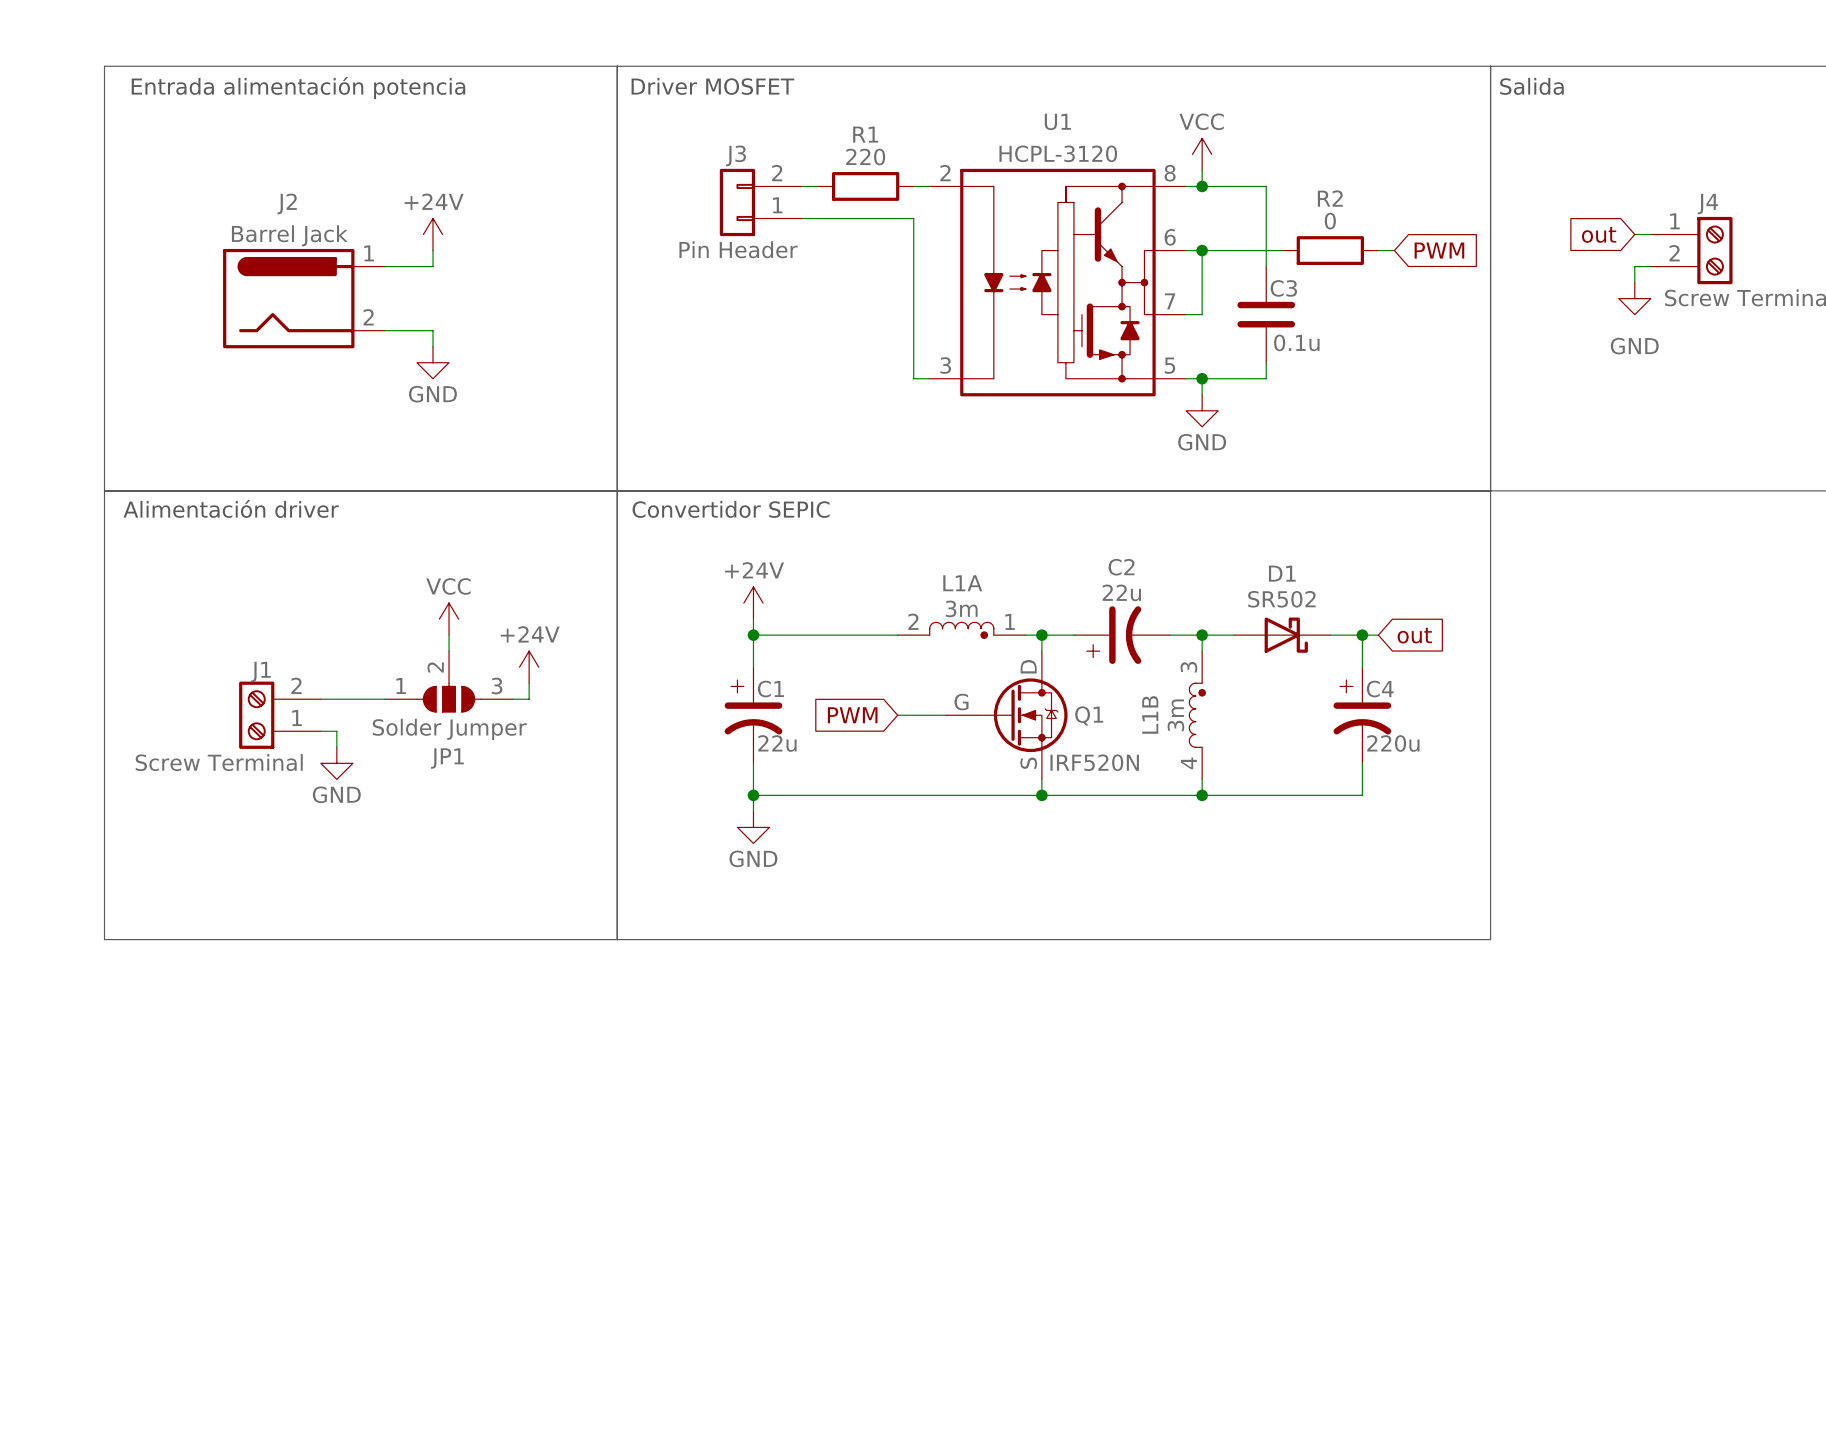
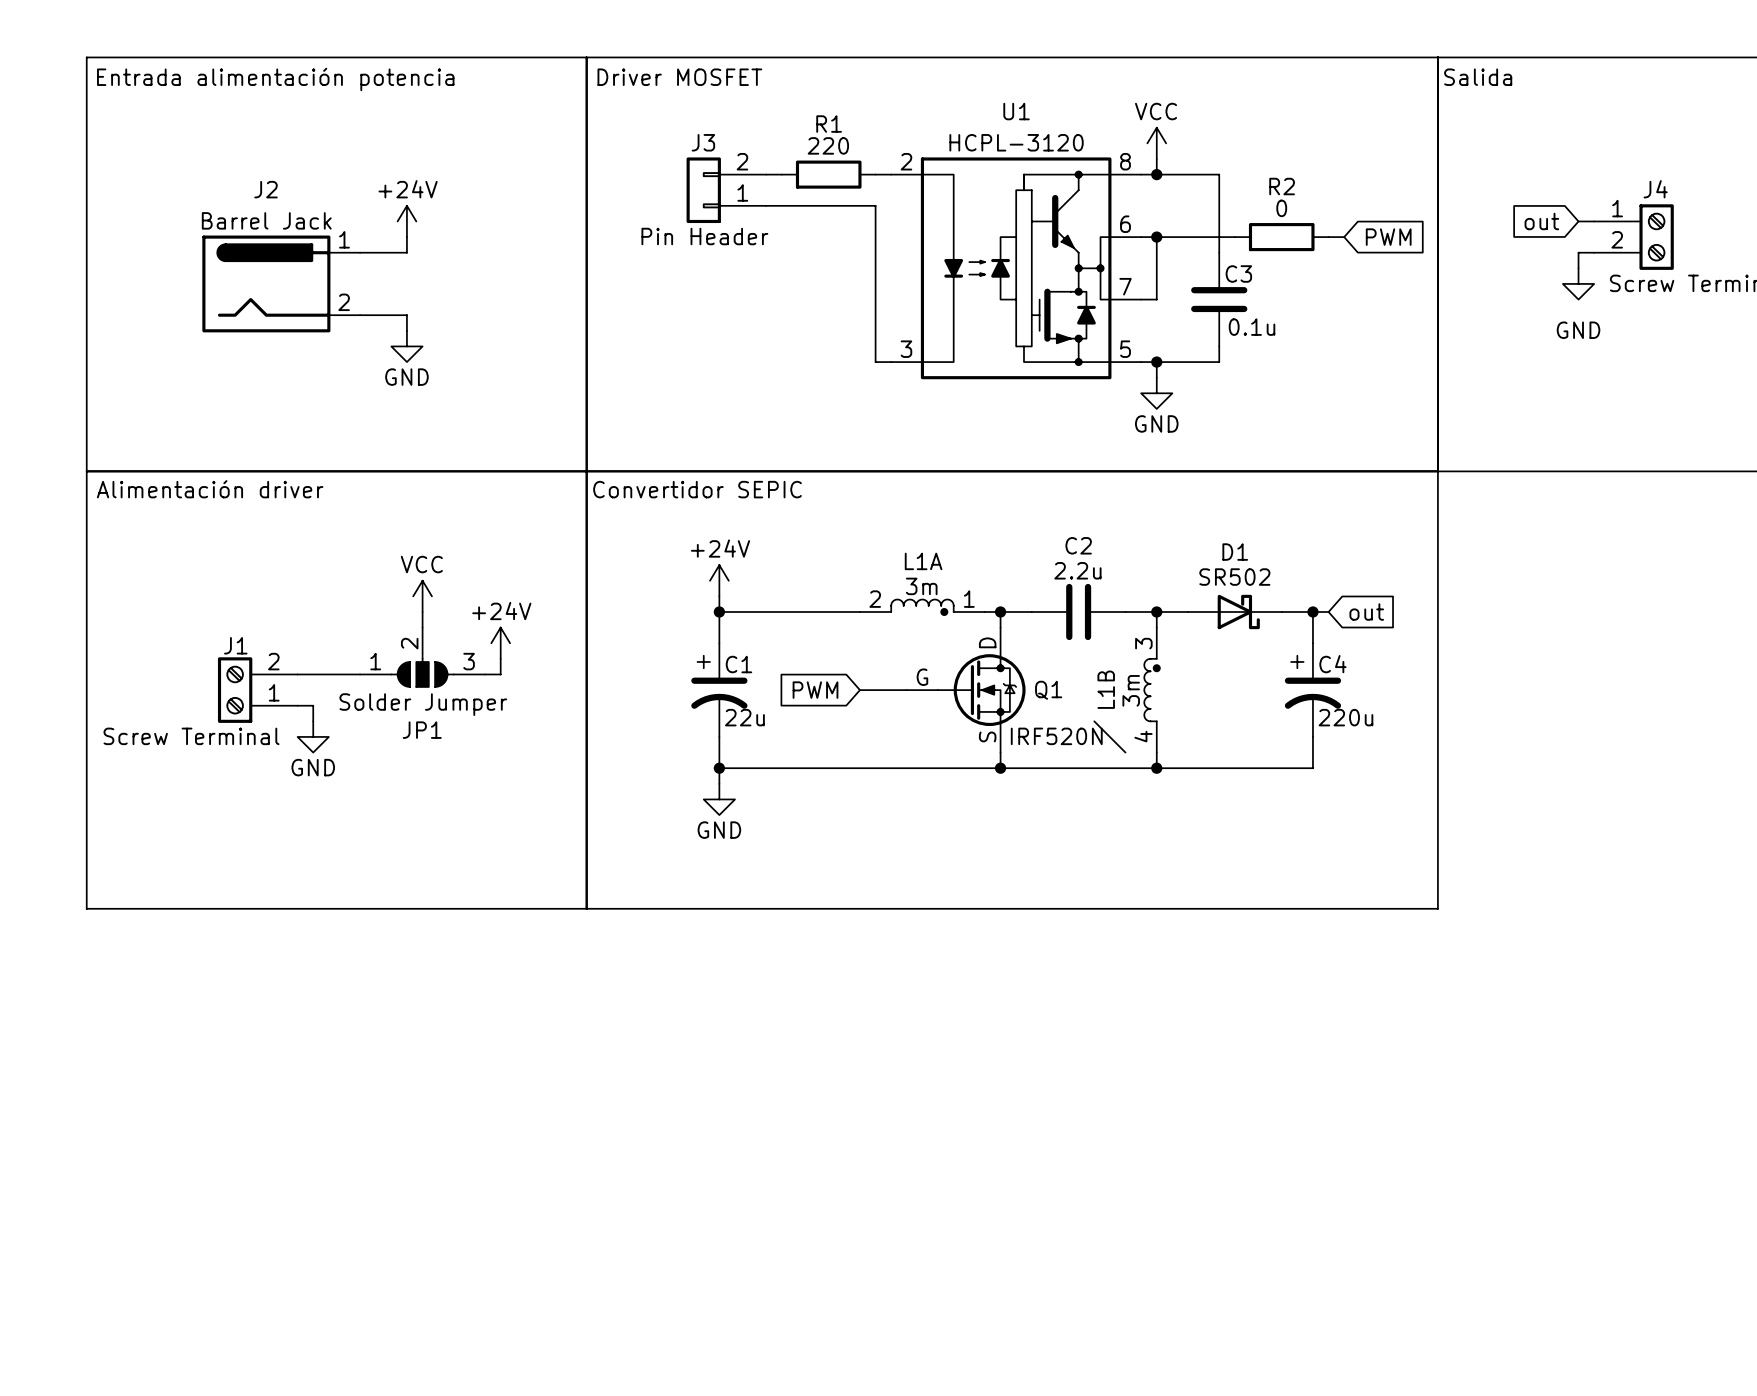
C2 value: 22u (1121, 592) -> 2.2u (1077, 570)
C2 symbol: [1073, 606, 1171, 664] -> [1031, 583, 1126, 641]
wire: none -> (1094, 721) (1125, 752)

